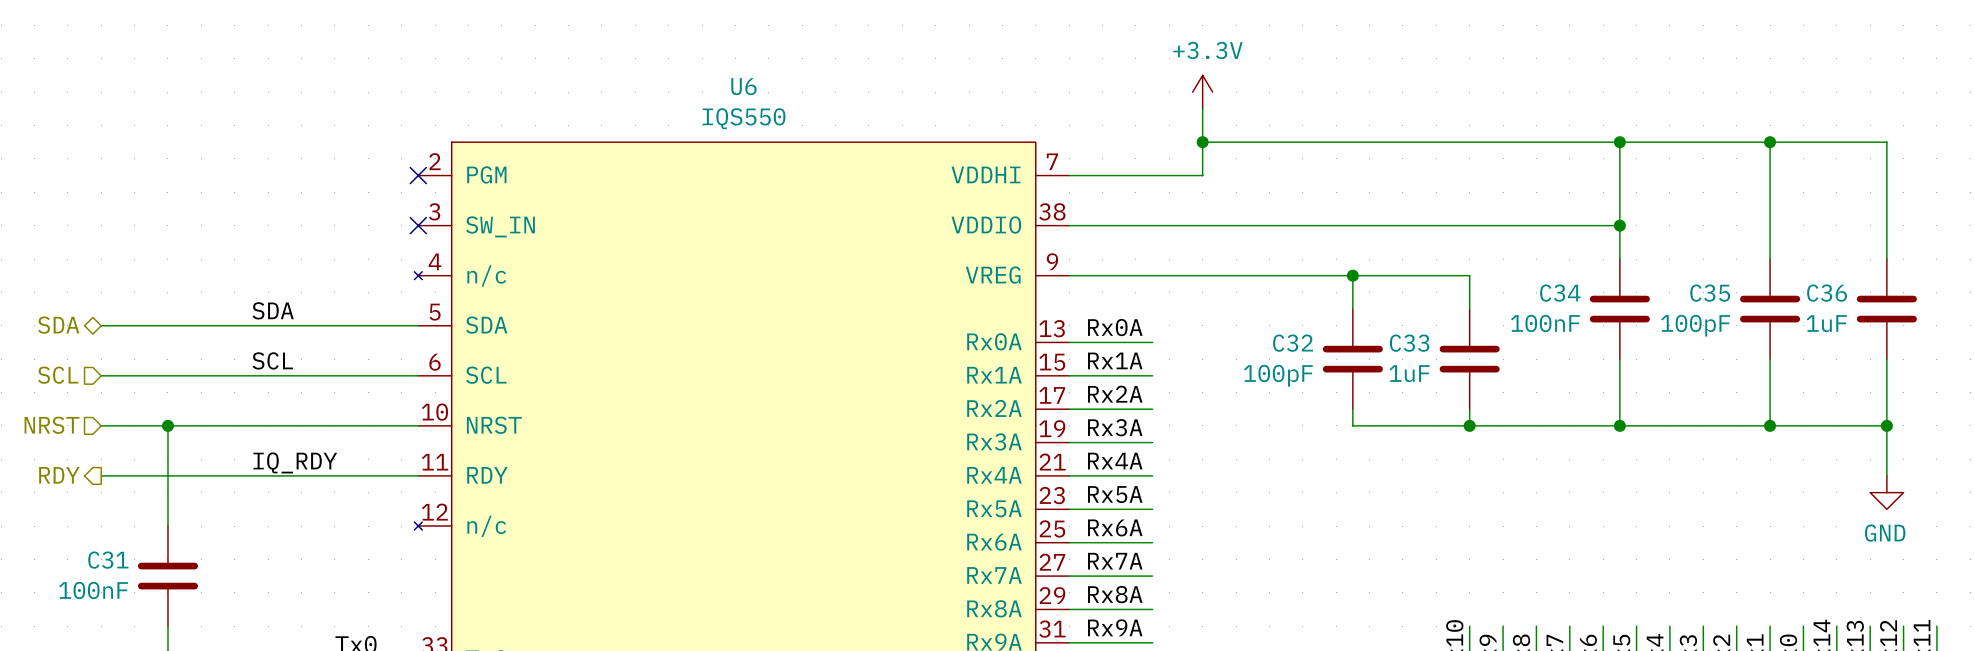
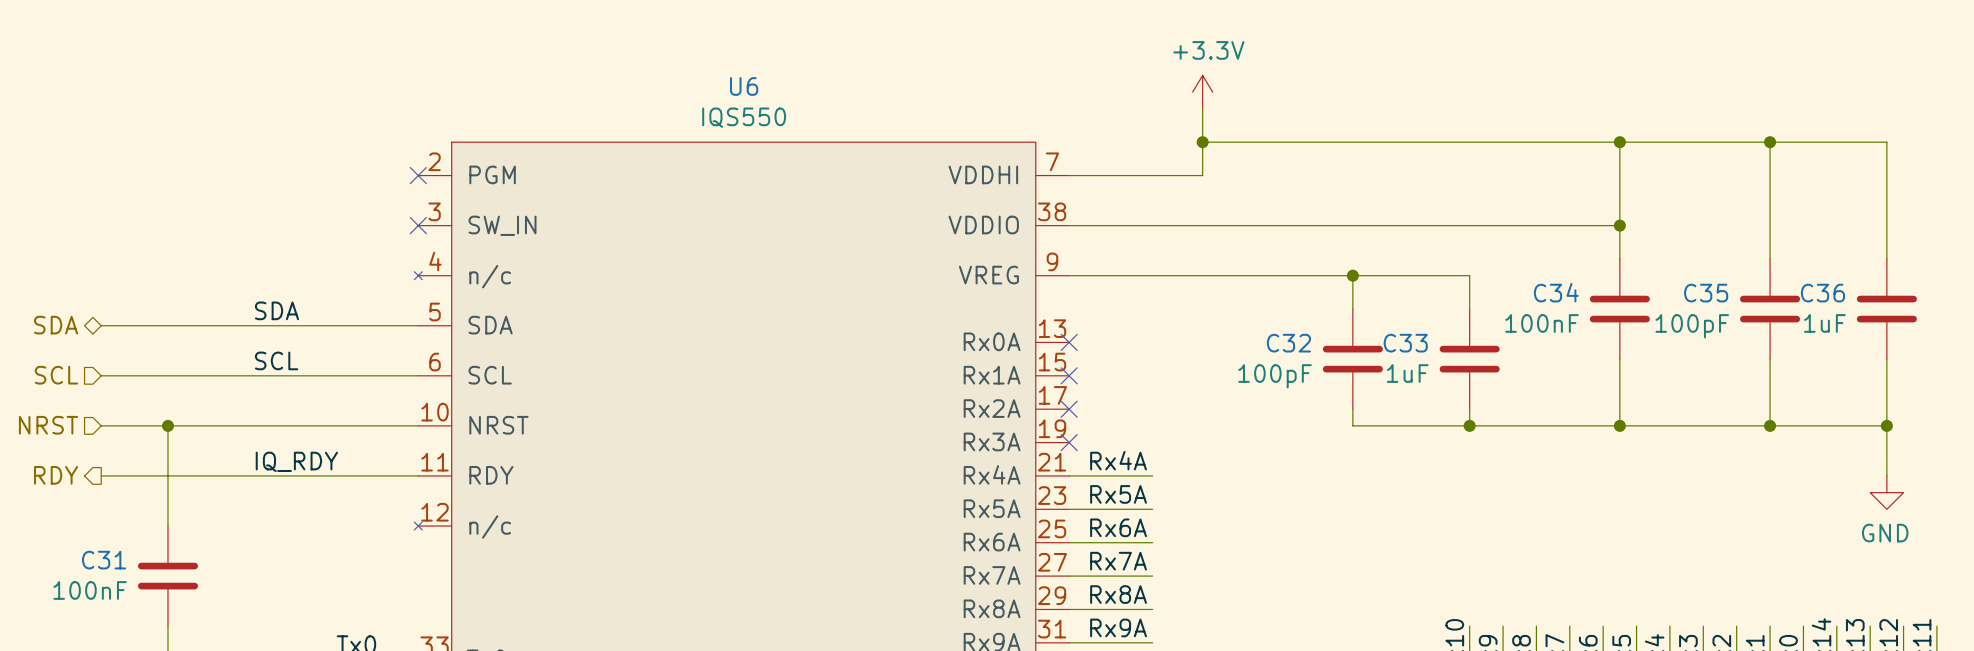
label: Rx0A (1115, 327) -> none
wire: (1069, 342) (1152, 342) -> none
no-connect mark: none -> (1069, 342)
label: Rx1A (1115, 360) -> none
wire: (1069, 375) (1152, 375) -> none
no-connect mark: none -> (1069, 375)
label: Rx2A (1115, 394) -> none
wire: (1069, 409) (1152, 409) -> none
no-connect mark: none -> (1069, 409)
label: Rx3A (1115, 427) -> none
wire: (1069, 442) (1152, 442) -> none
no-connect mark: none -> (1069, 442)

